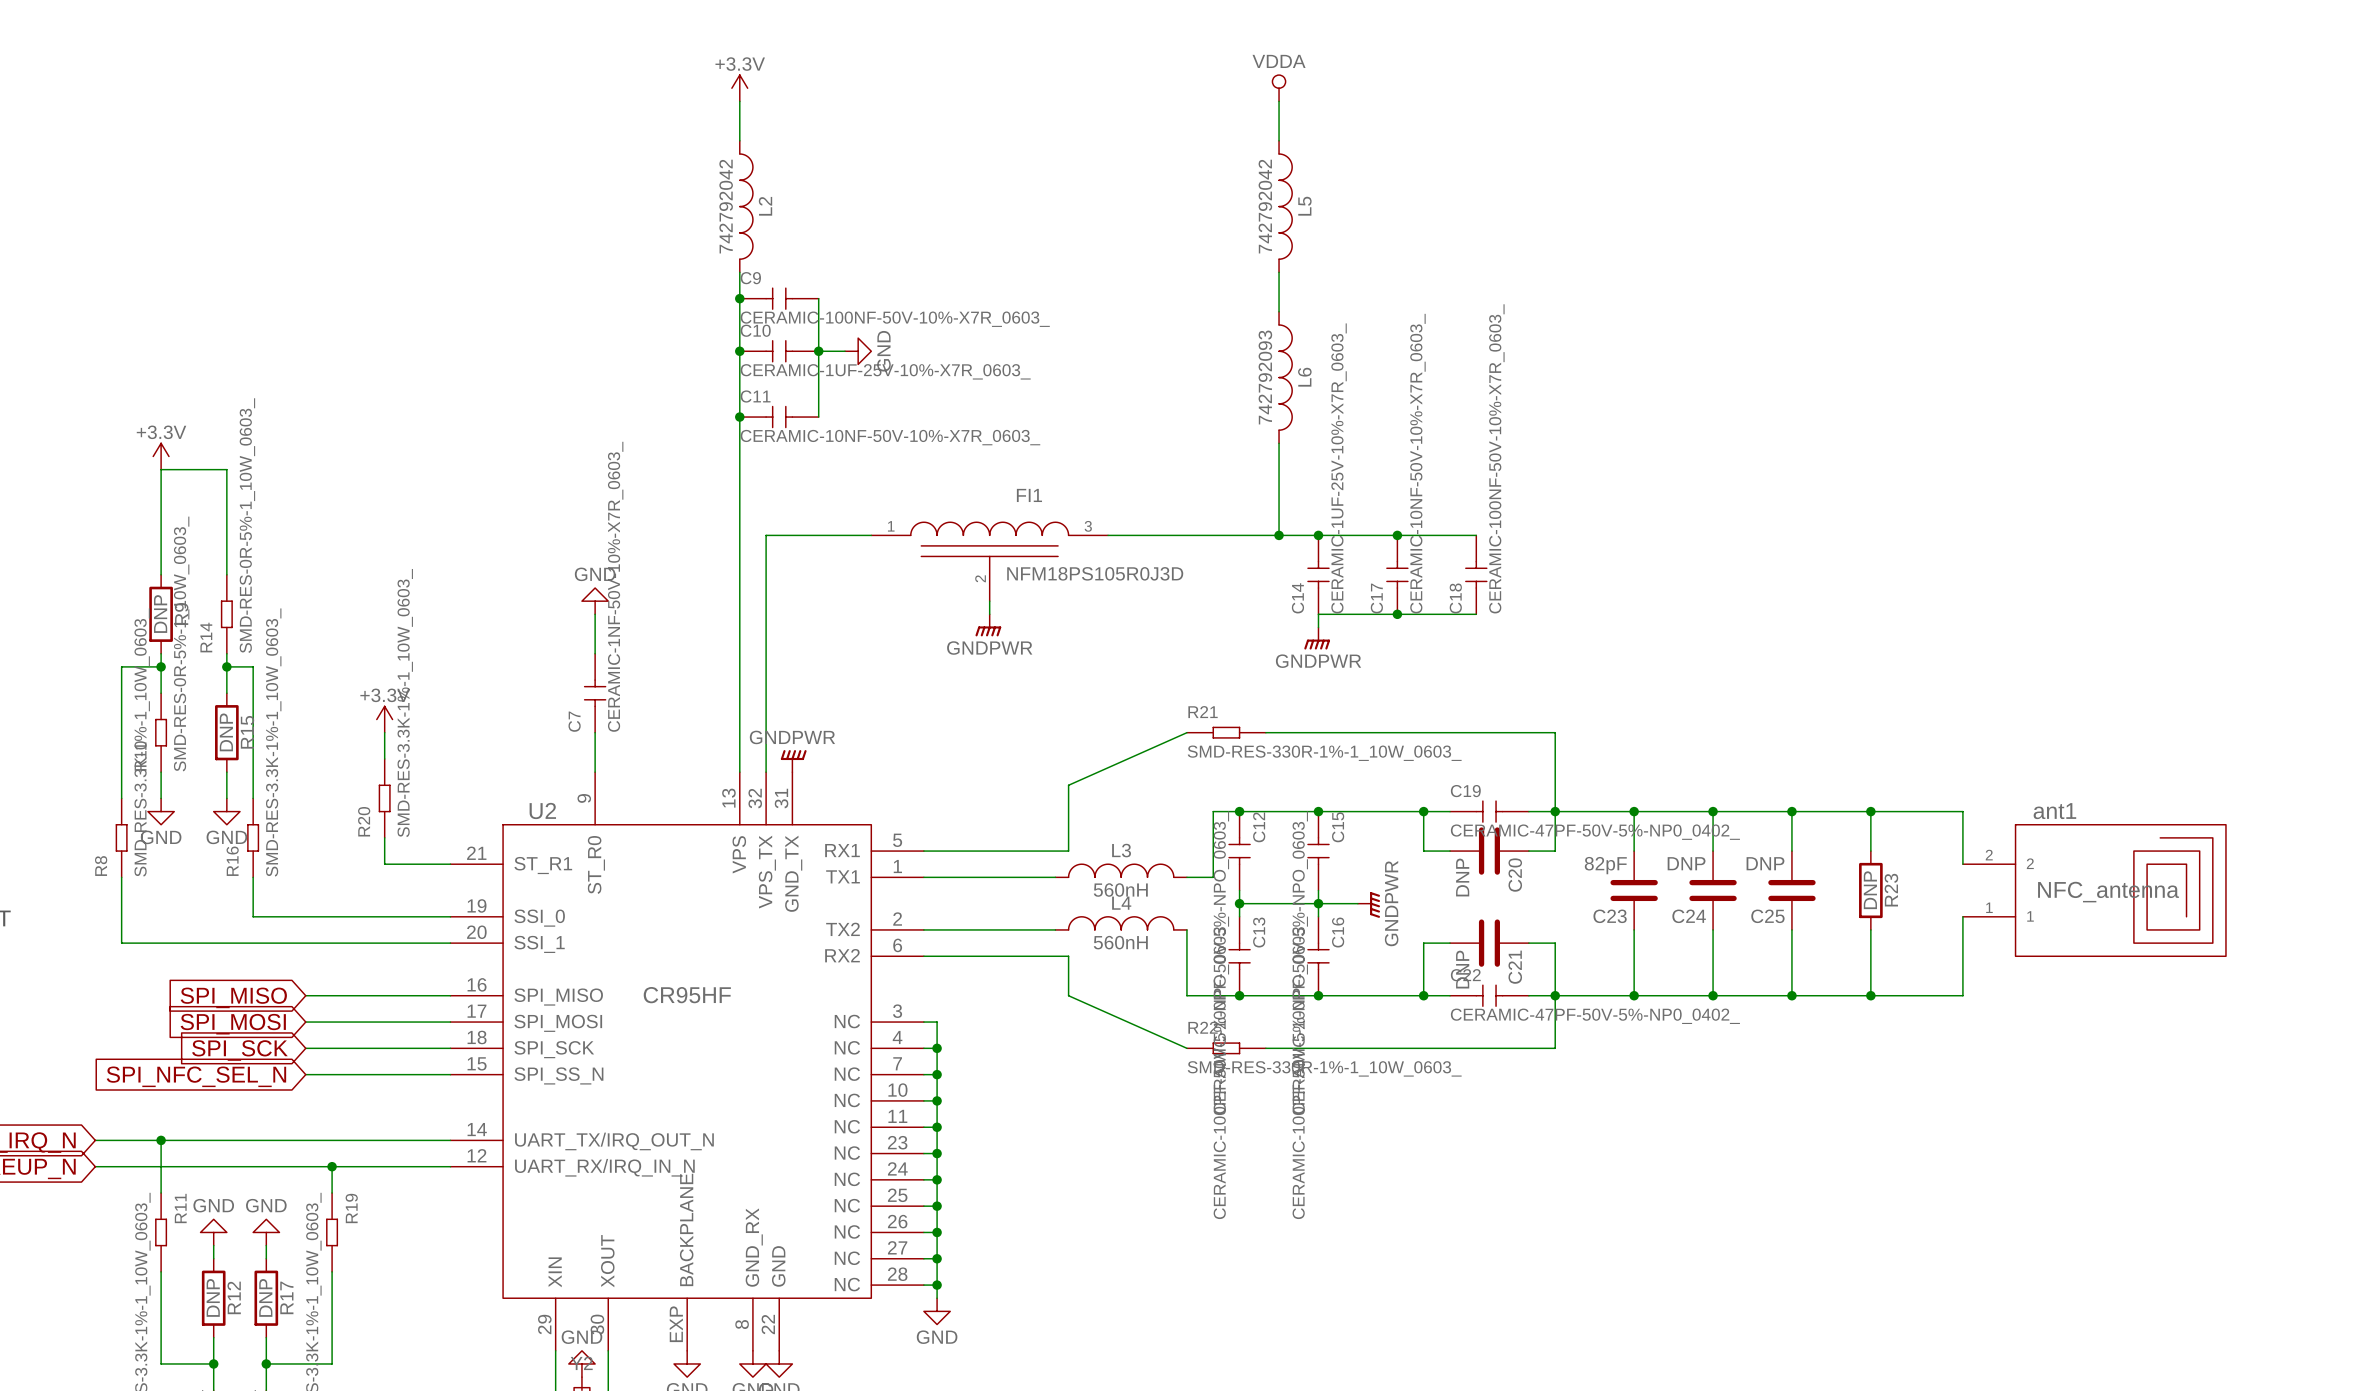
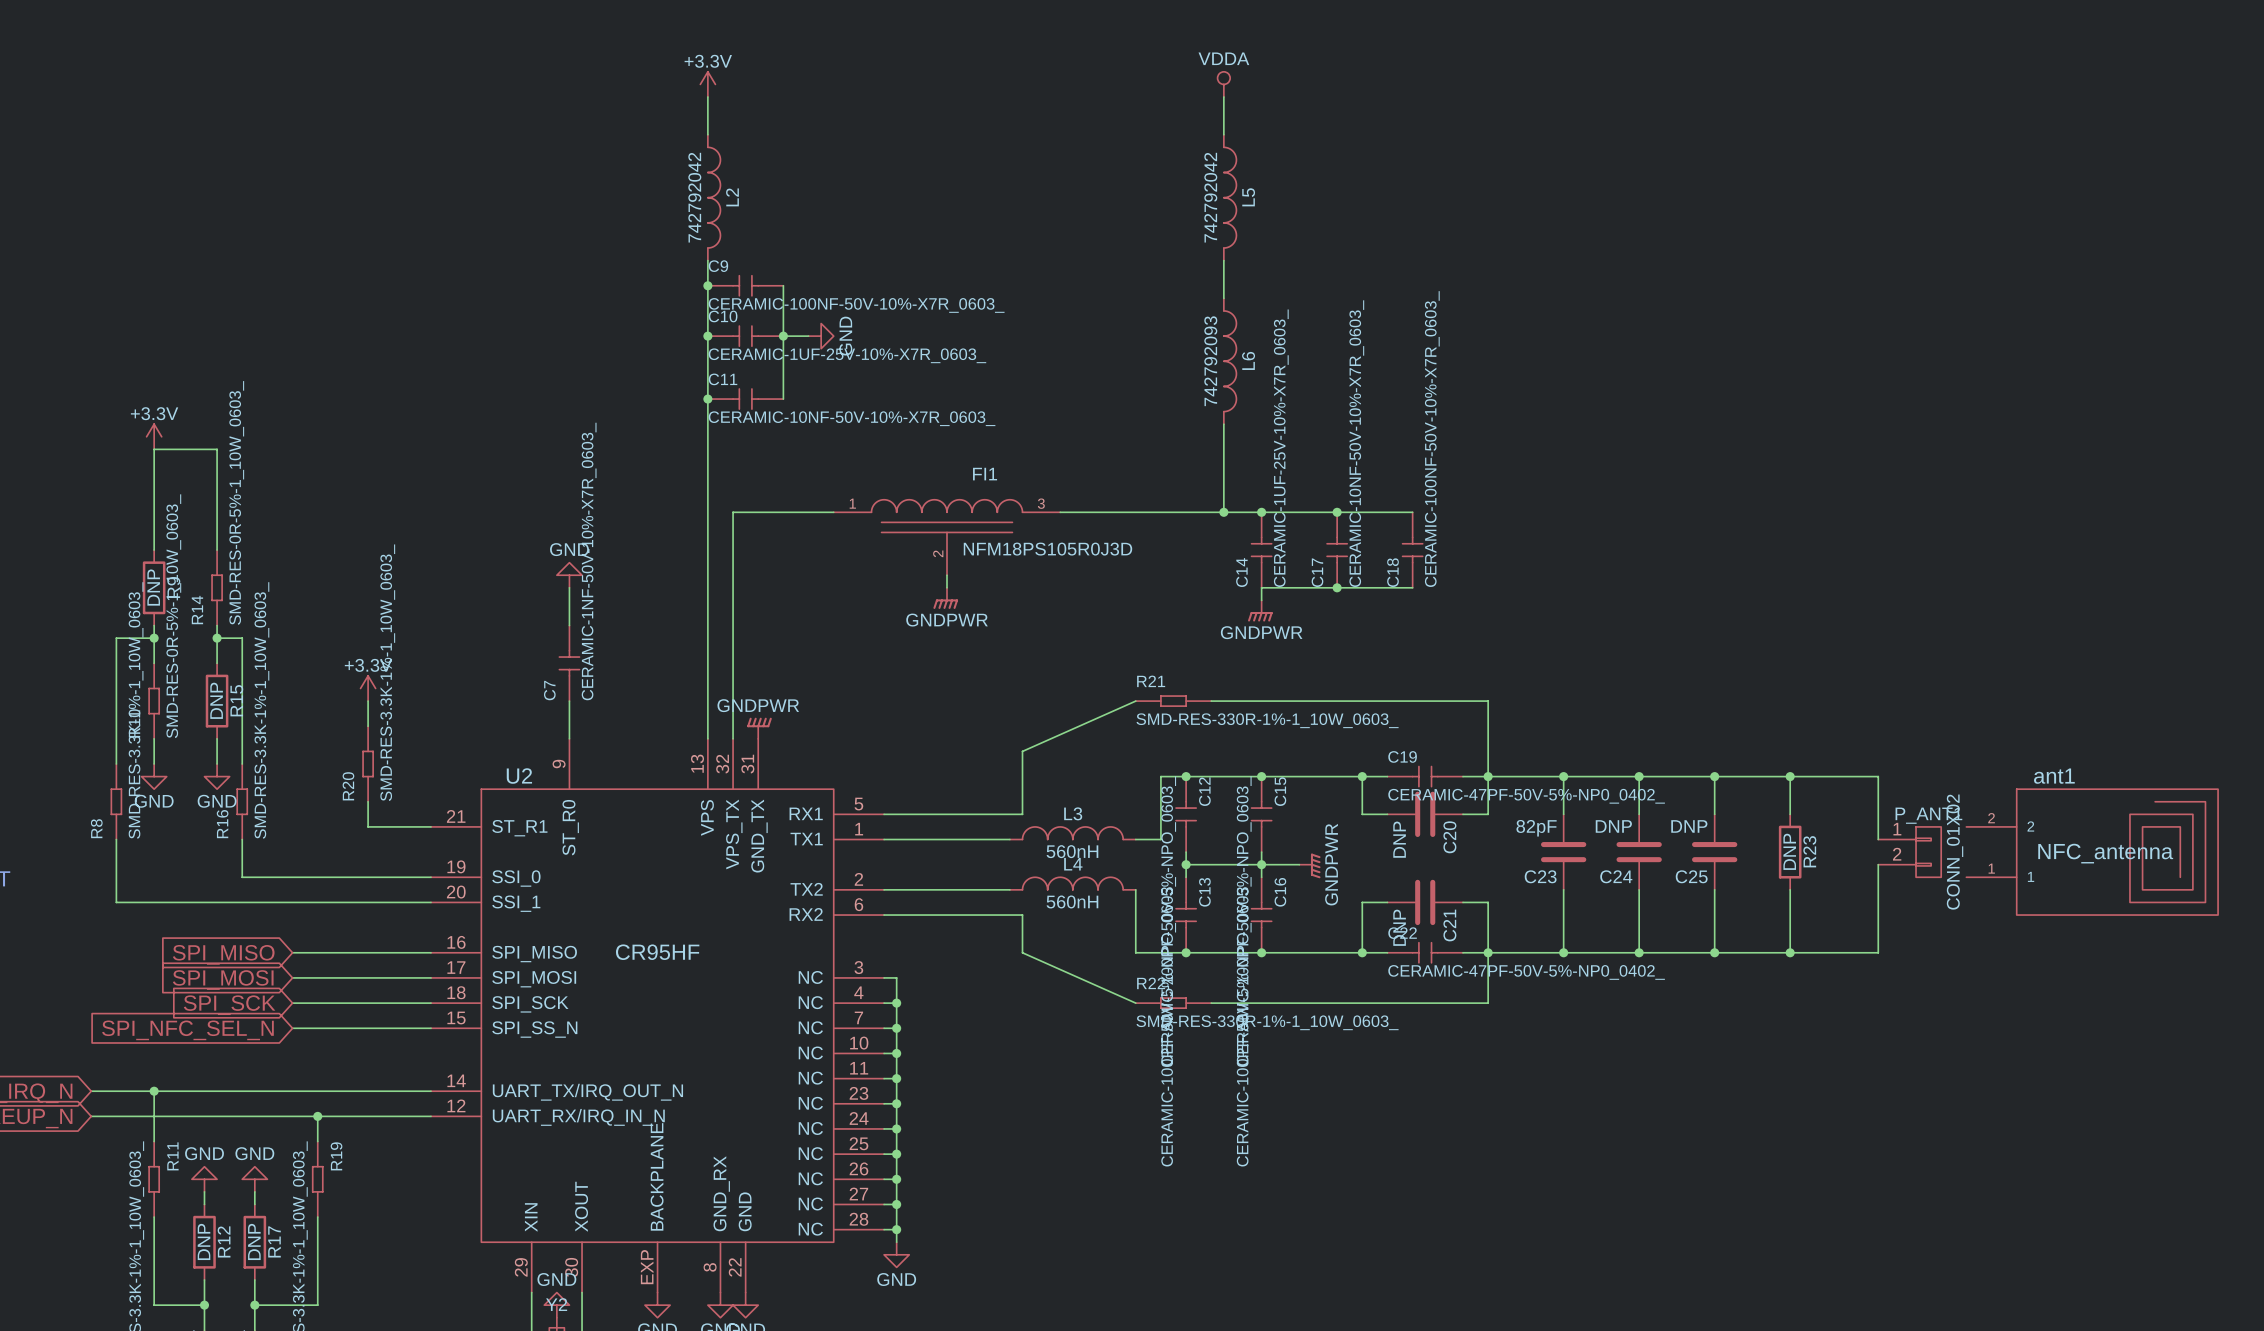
wire: none -> (1878, 826) (1878, 839)
P_ANT1: none -> CONN_01X02 (1909, 852)
ant1 position: (2094, 890) -> (2092, 852)
wire: none -> (1878, 864) (1878, 877)

